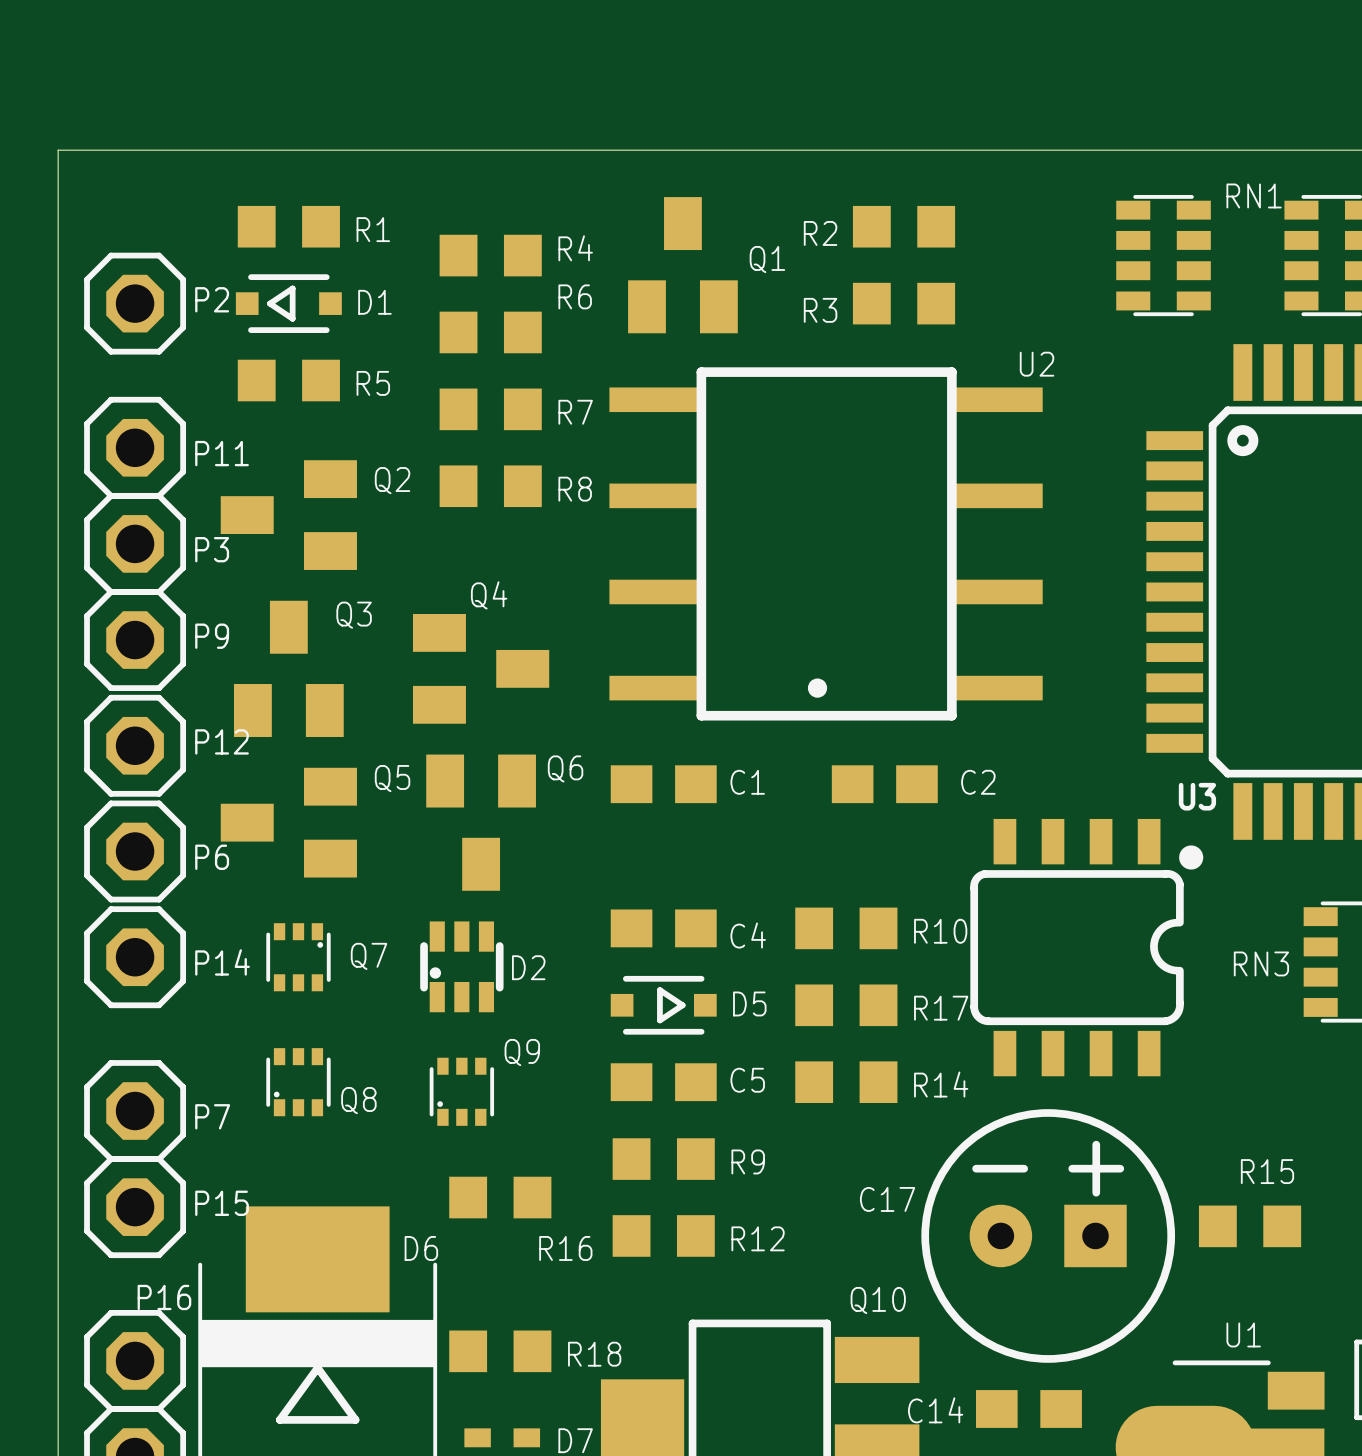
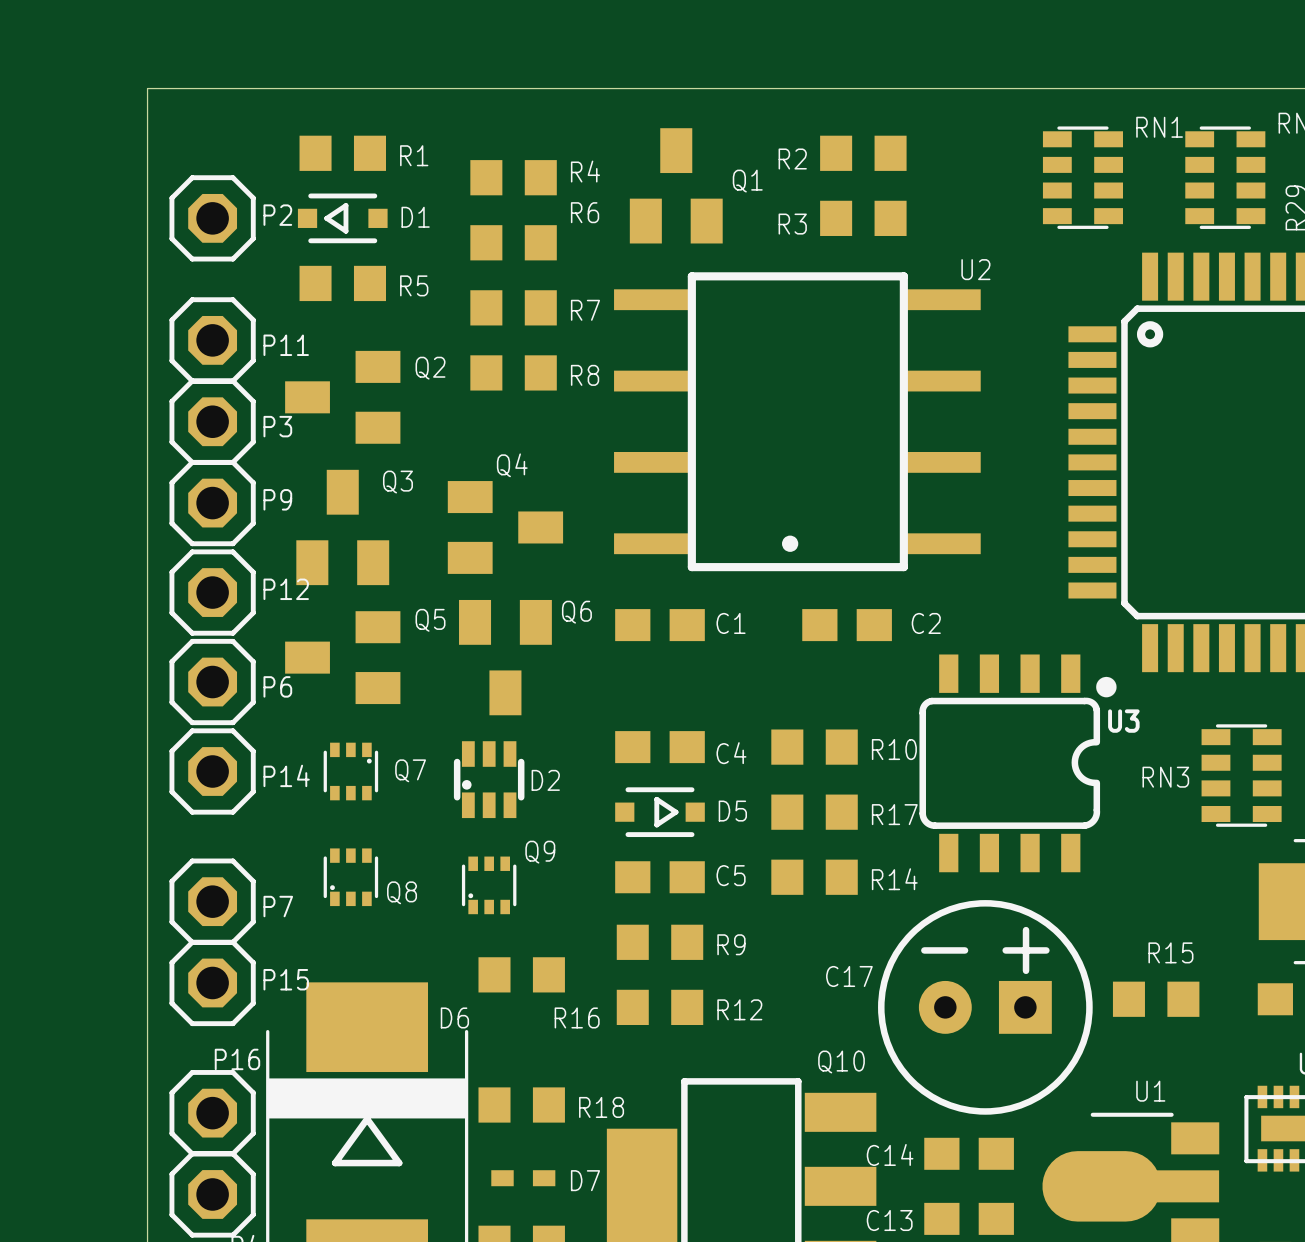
U3 name position: U3 (1197, 796) -> U3 (1123, 721)

